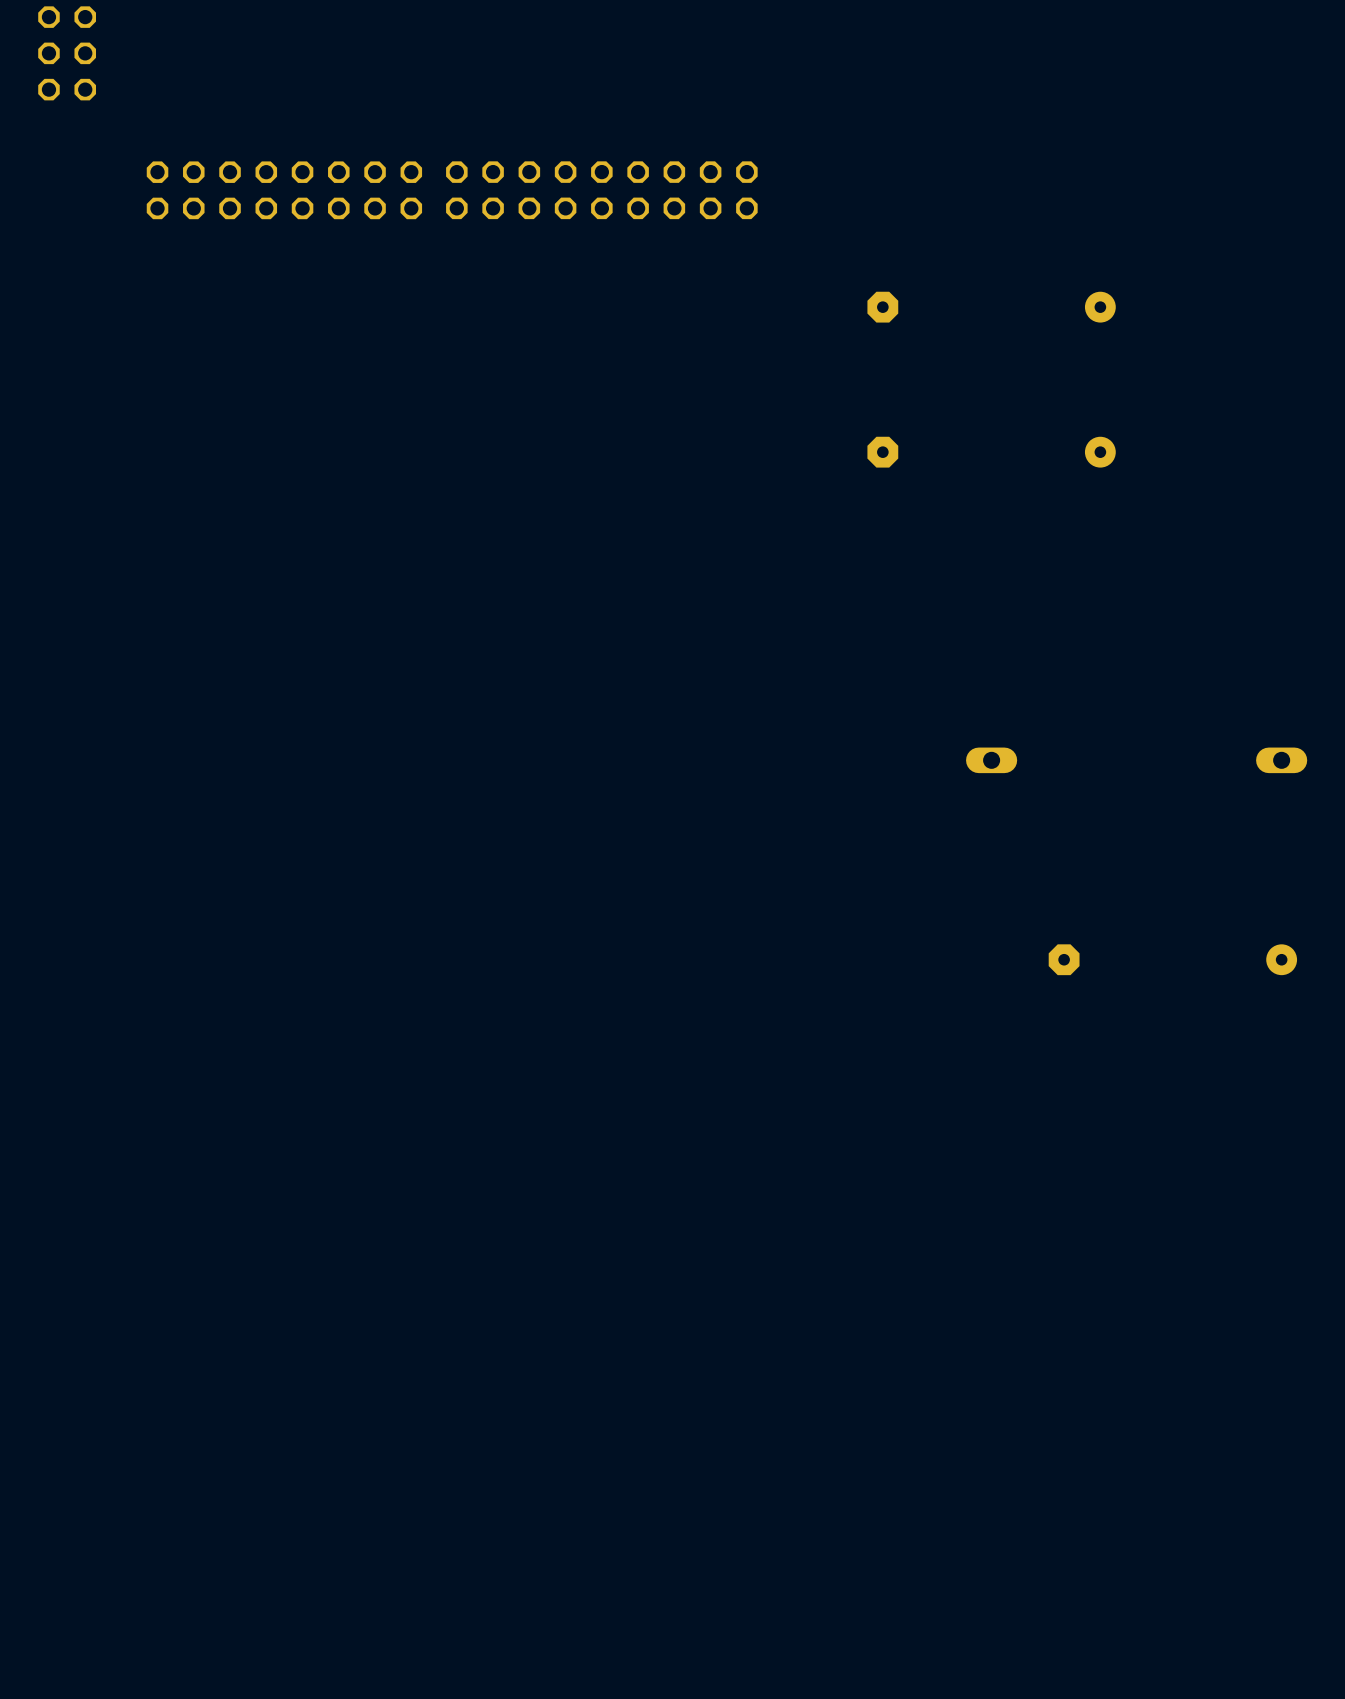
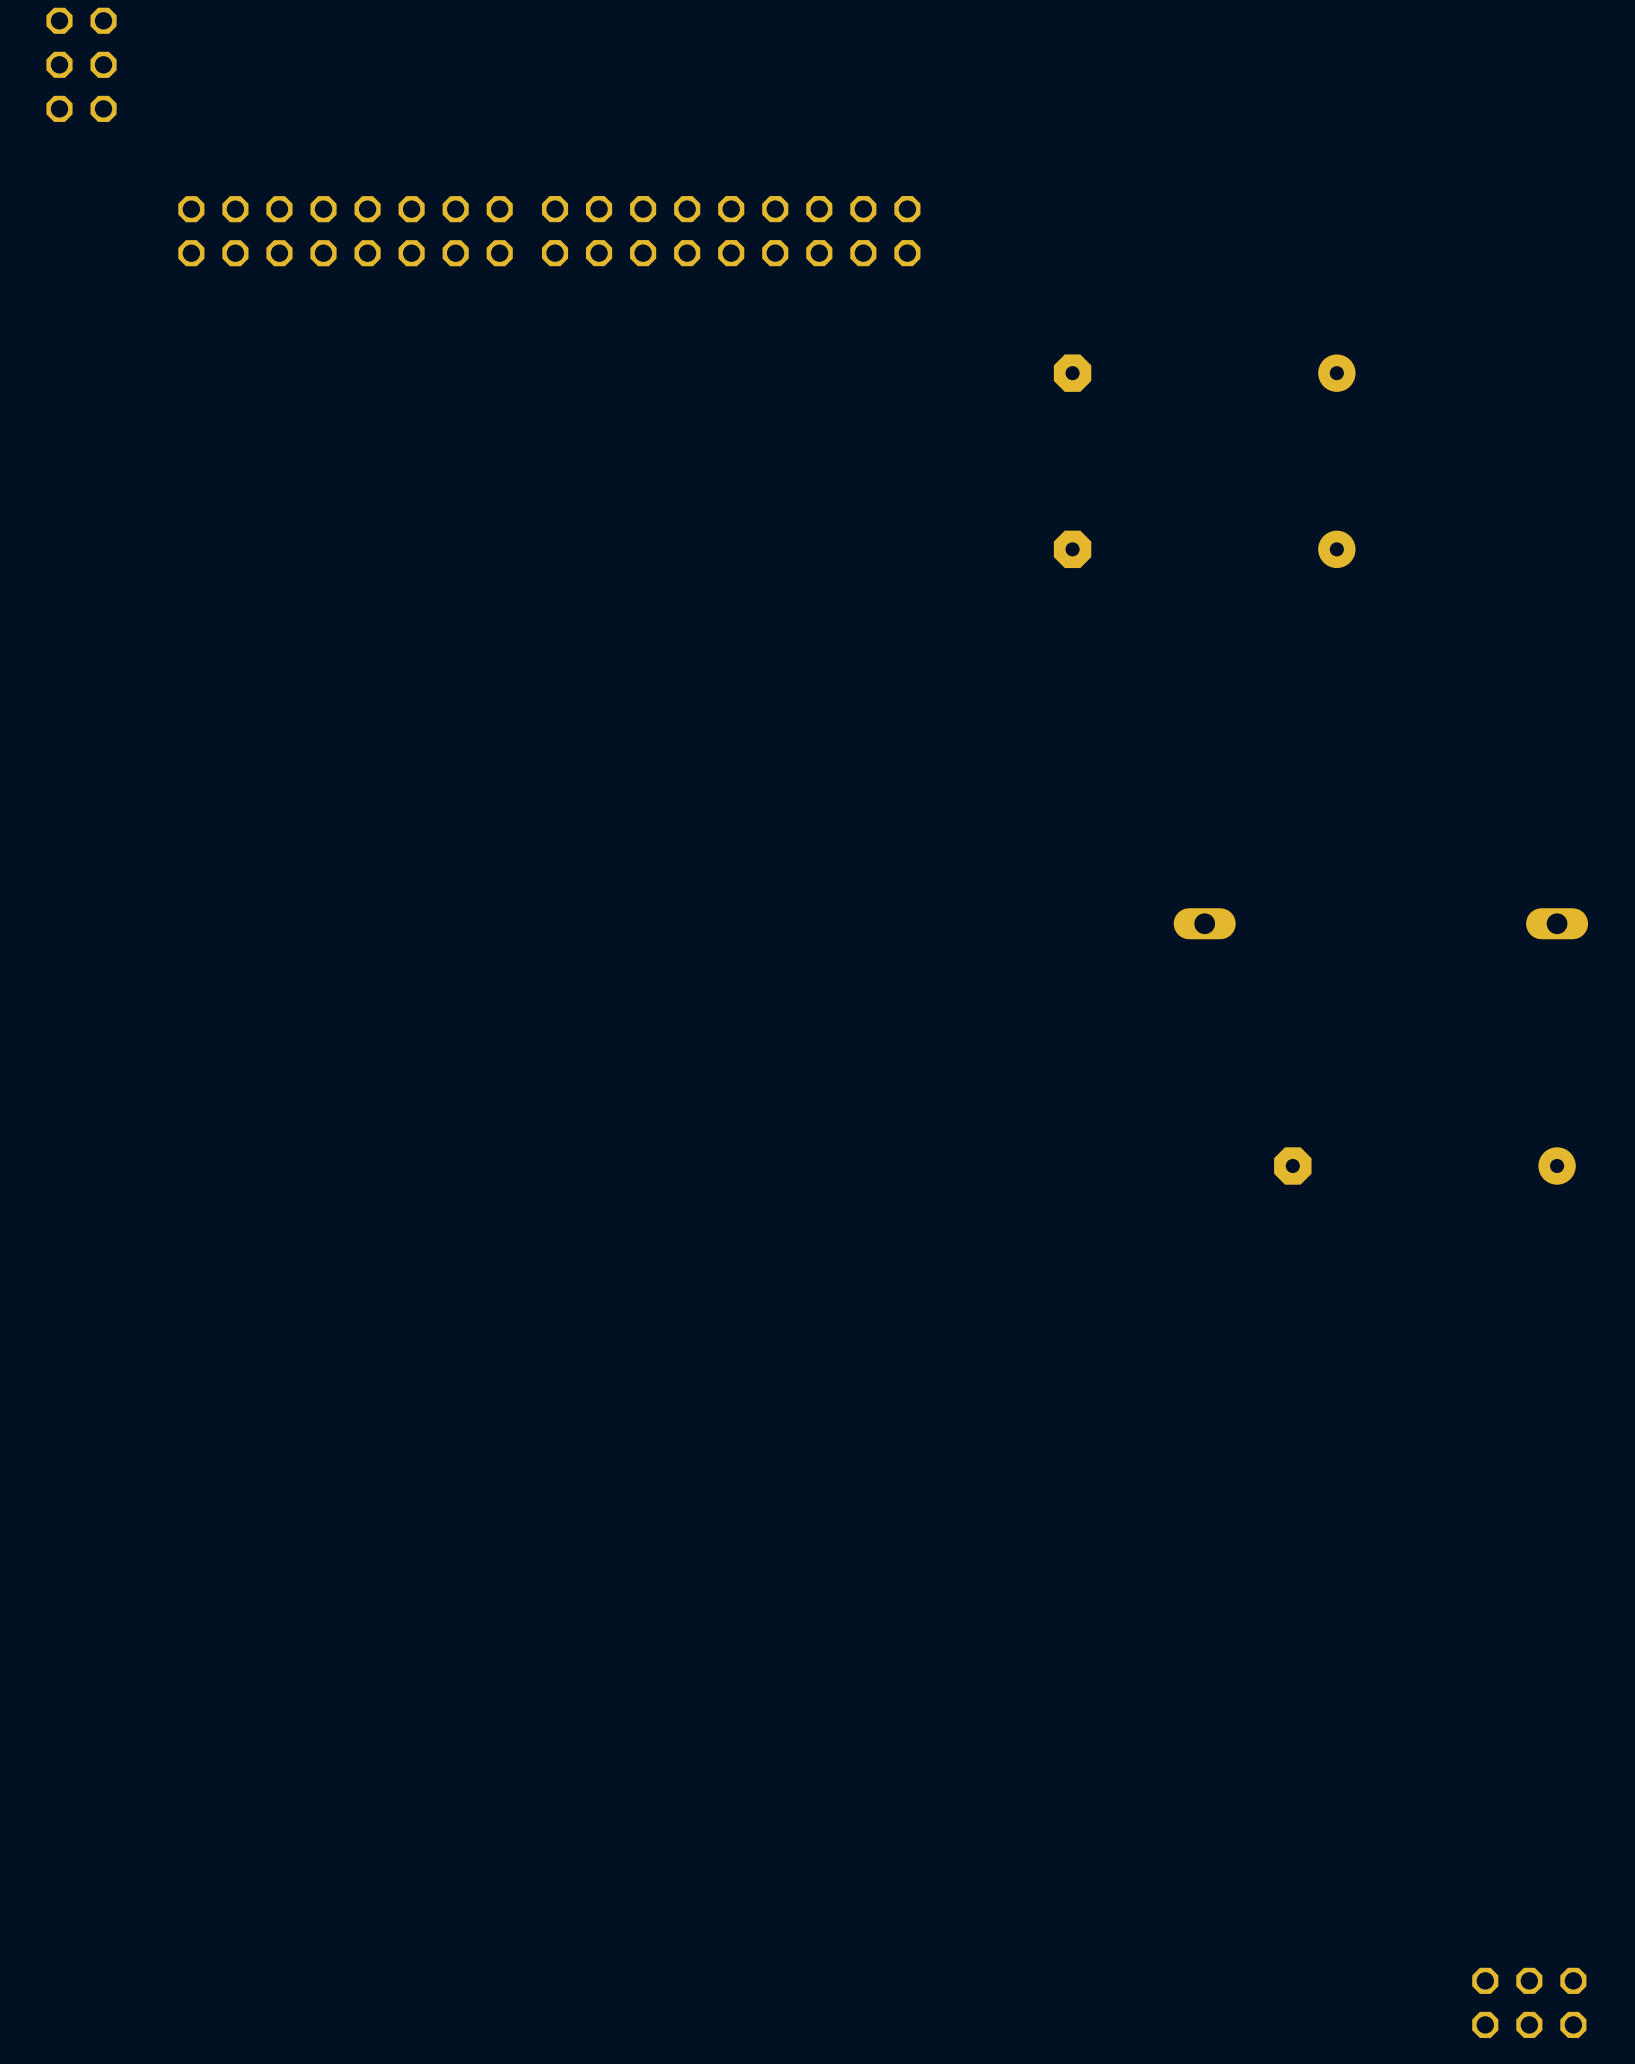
part: none -> (1529, 2002)

